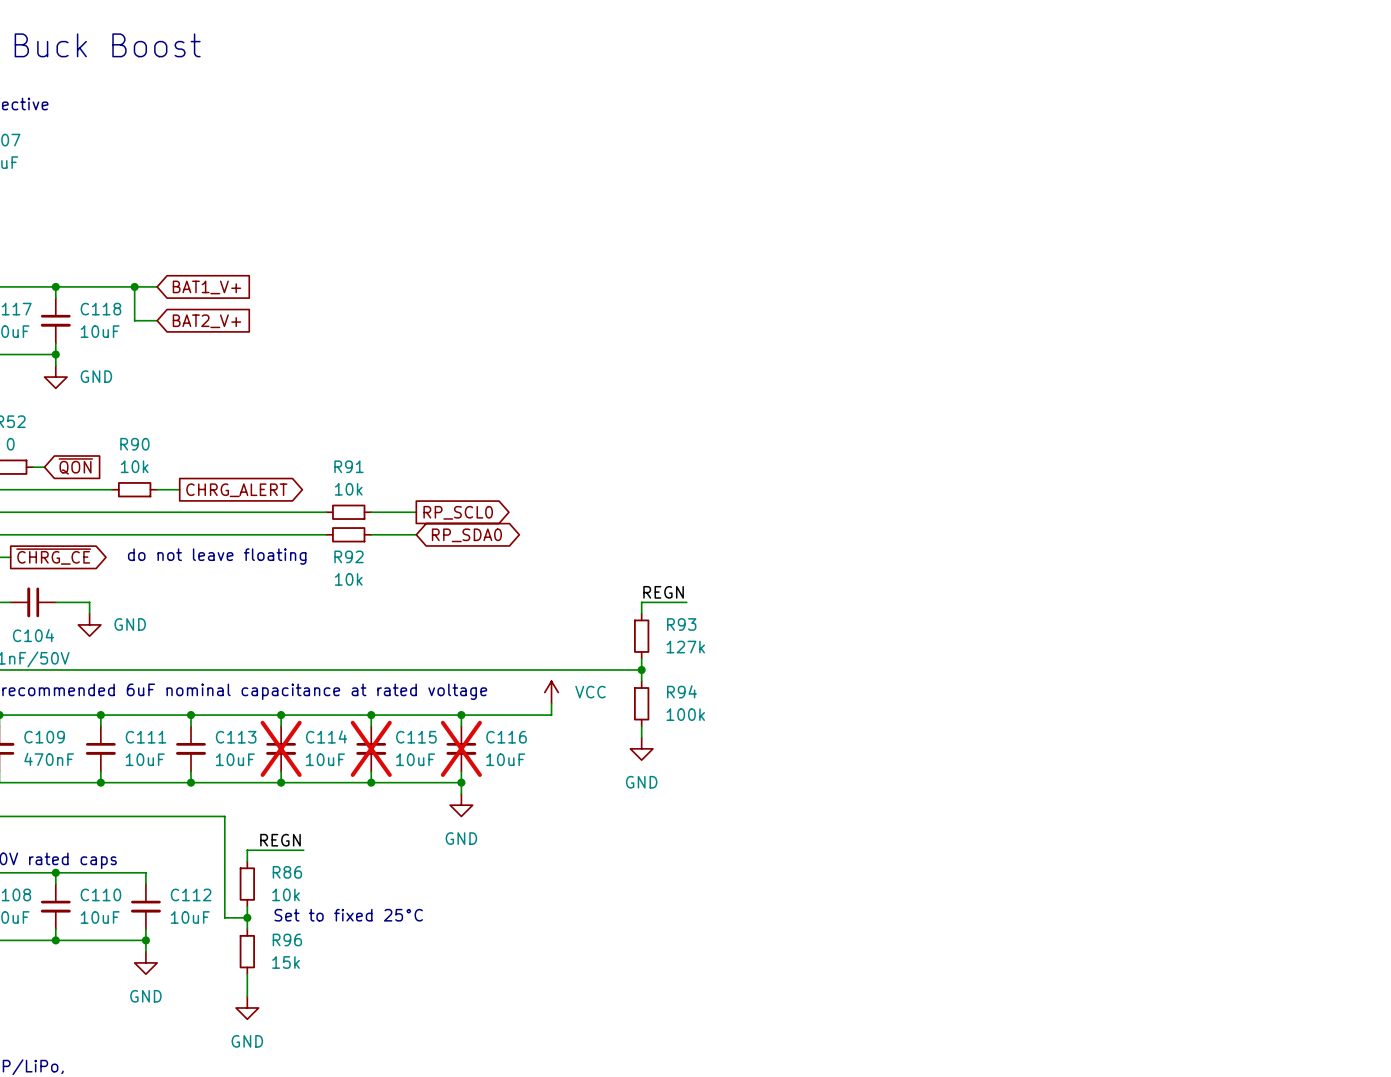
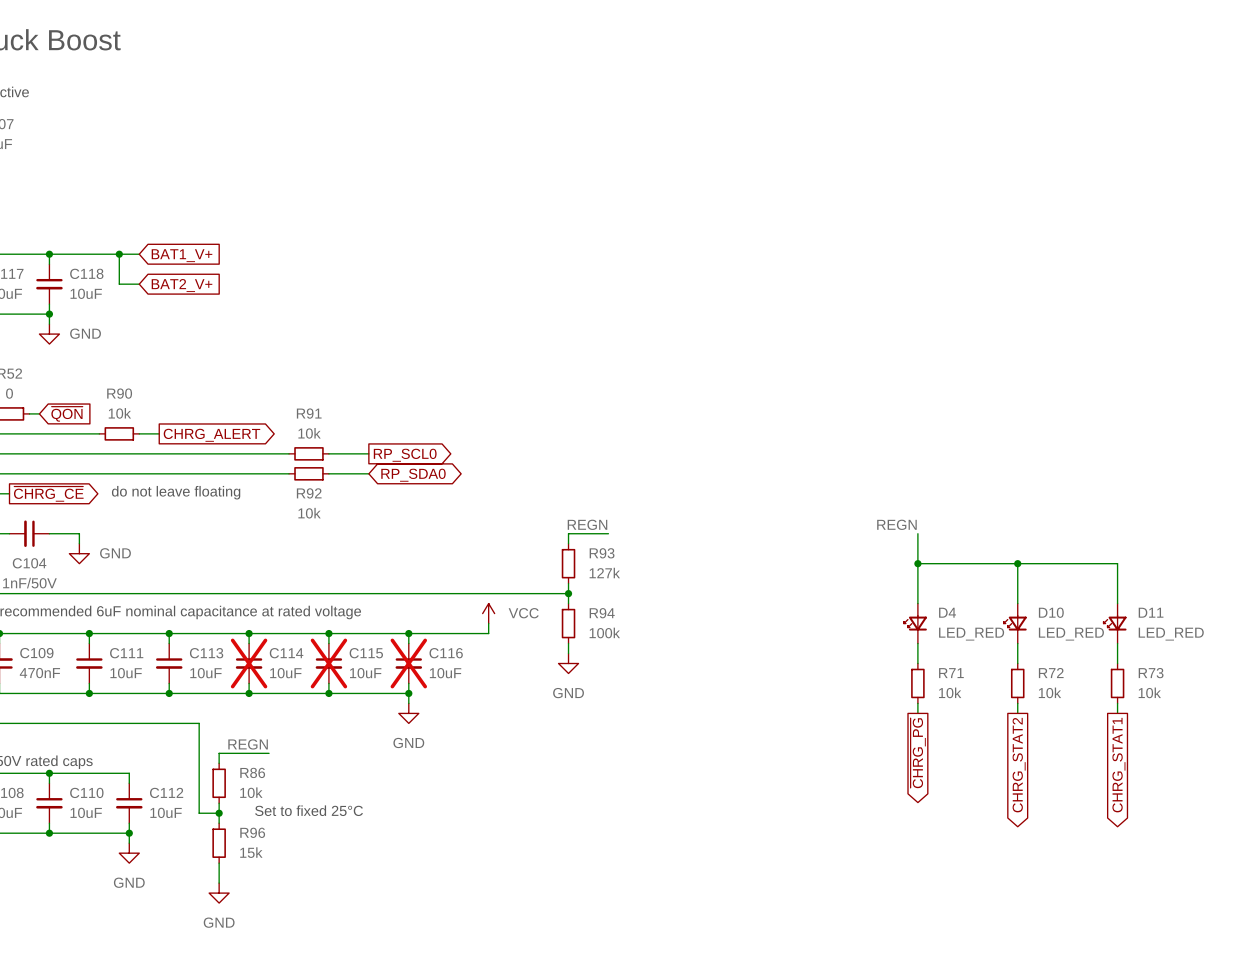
label: none -> REGN (896, 524)
wire: none -> (917, 533) (917, 603)
wire: none -> (917, 563) (1117, 563) (1117, 603)
junction: none -> (917, 563)
wire: none -> (1017, 563) (1017, 603)
junction: none -> (1017, 563)
D4: none -> LED_RED (915, 623)
D10: none -> LED_RED (1015, 623)
D11: none -> LED_RED (1115, 623)
wire: none -> (917, 643) (917, 663)
wire: none -> (1017, 643) (1017, 663)
wire: none -> (1117, 643) (1117, 663)
R71: none -> 10k (917, 683)
R72: none -> 10k (1017, 683)
R73: none -> 10k (1117, 683)
wire: none -> (917, 703) (917, 713)
wire: none -> (1017, 703) (1017, 713)
wire: none -> (1117, 703) (1117, 713)
global label: none -> ~{CHRG_PG} (918, 753)
global label: none -> CHRG_STAT2 (1019, 765)
global label: none -> CHRG_STAT1 (1118, 765)

